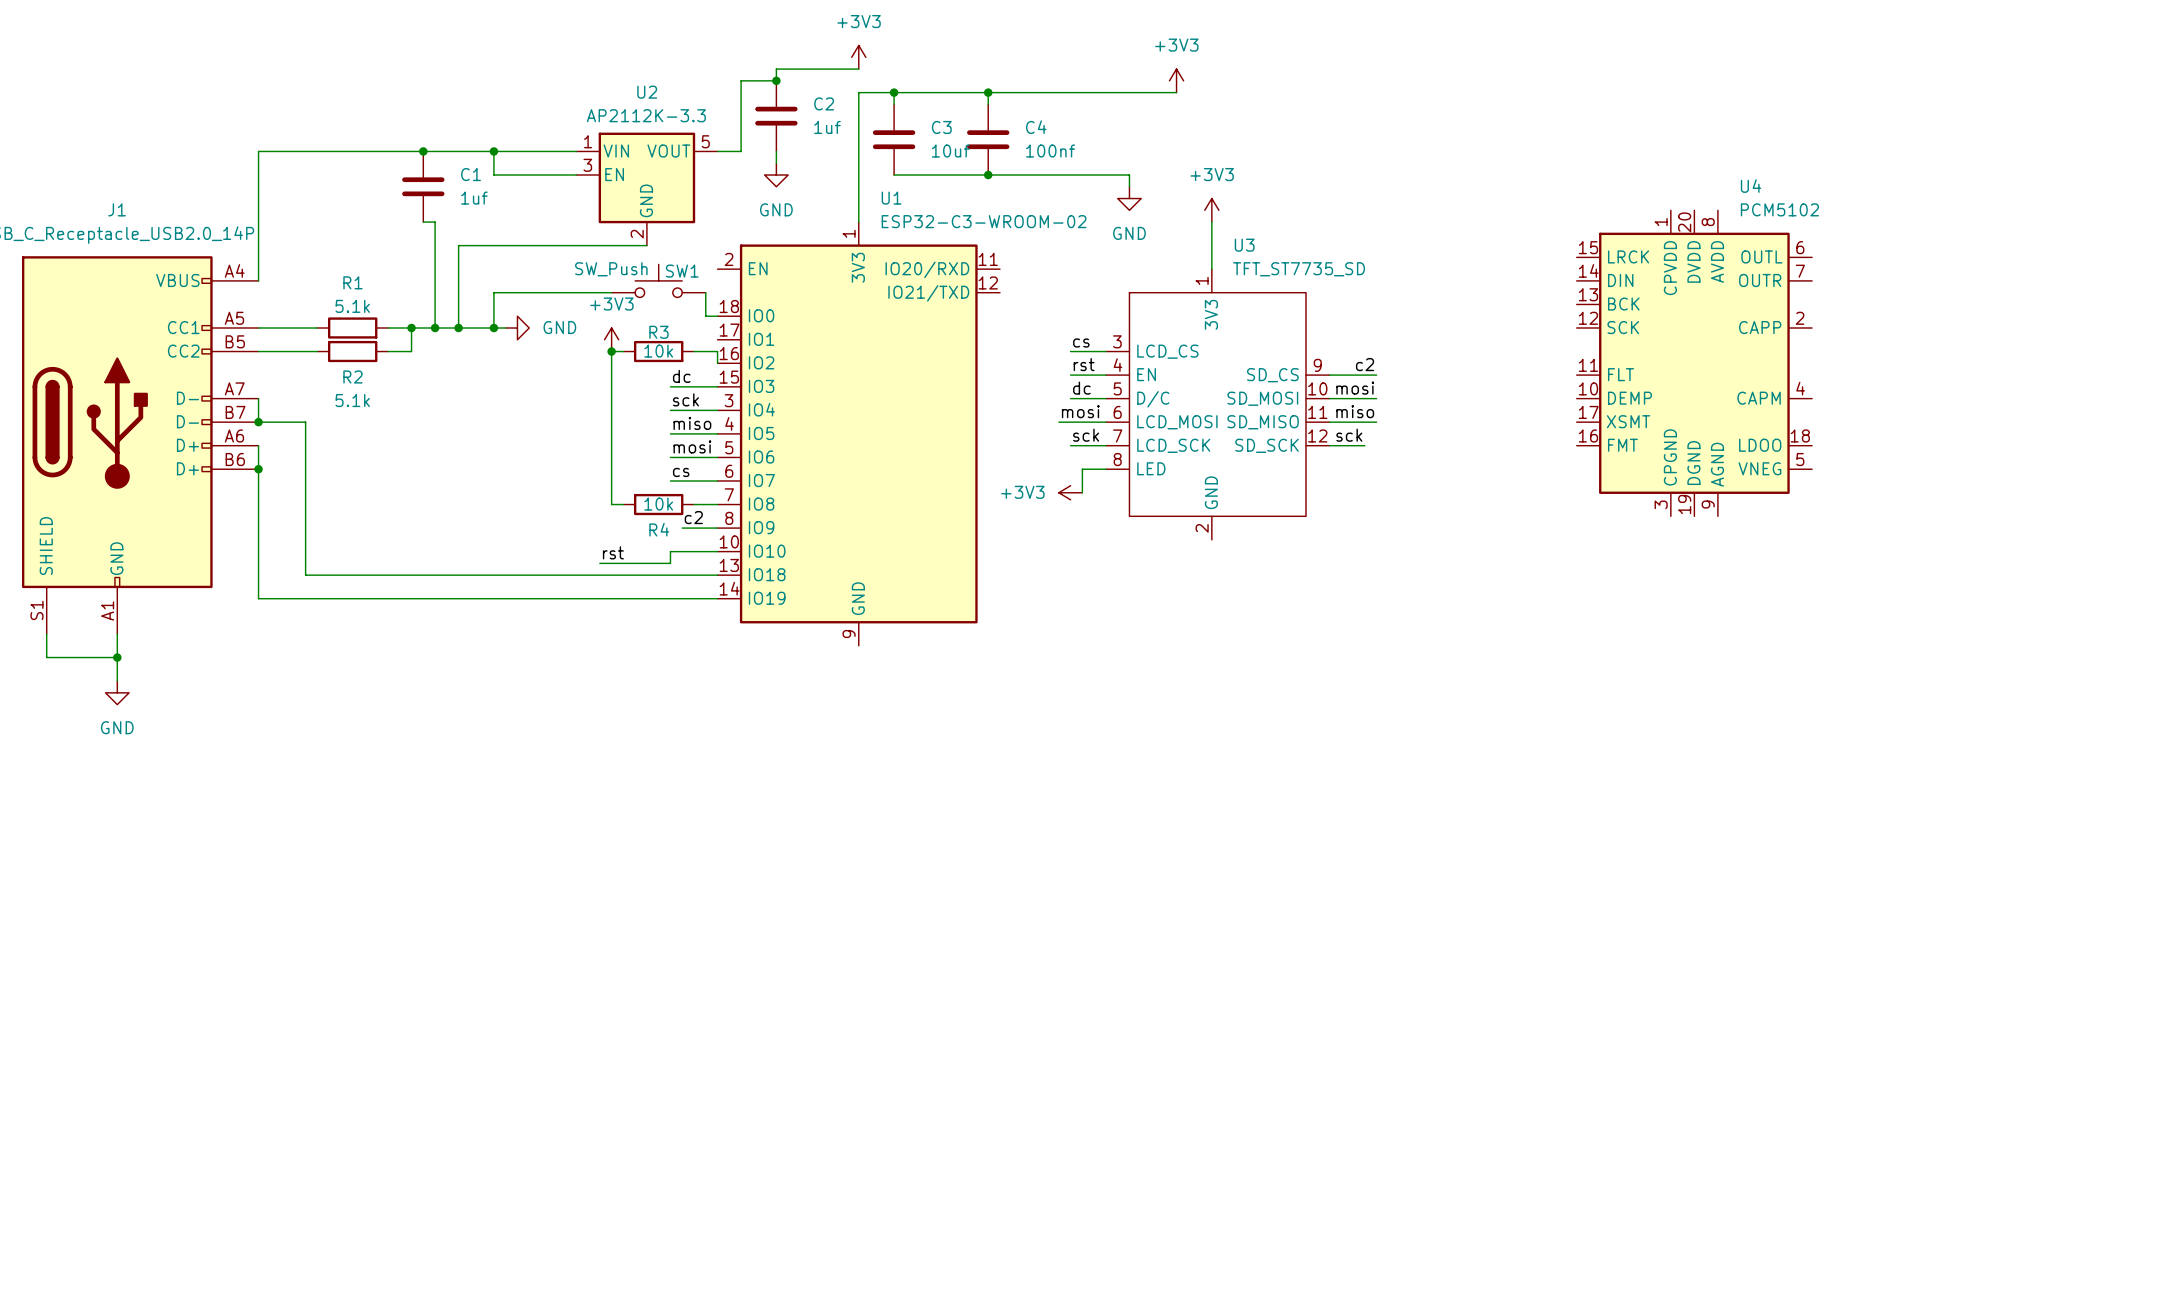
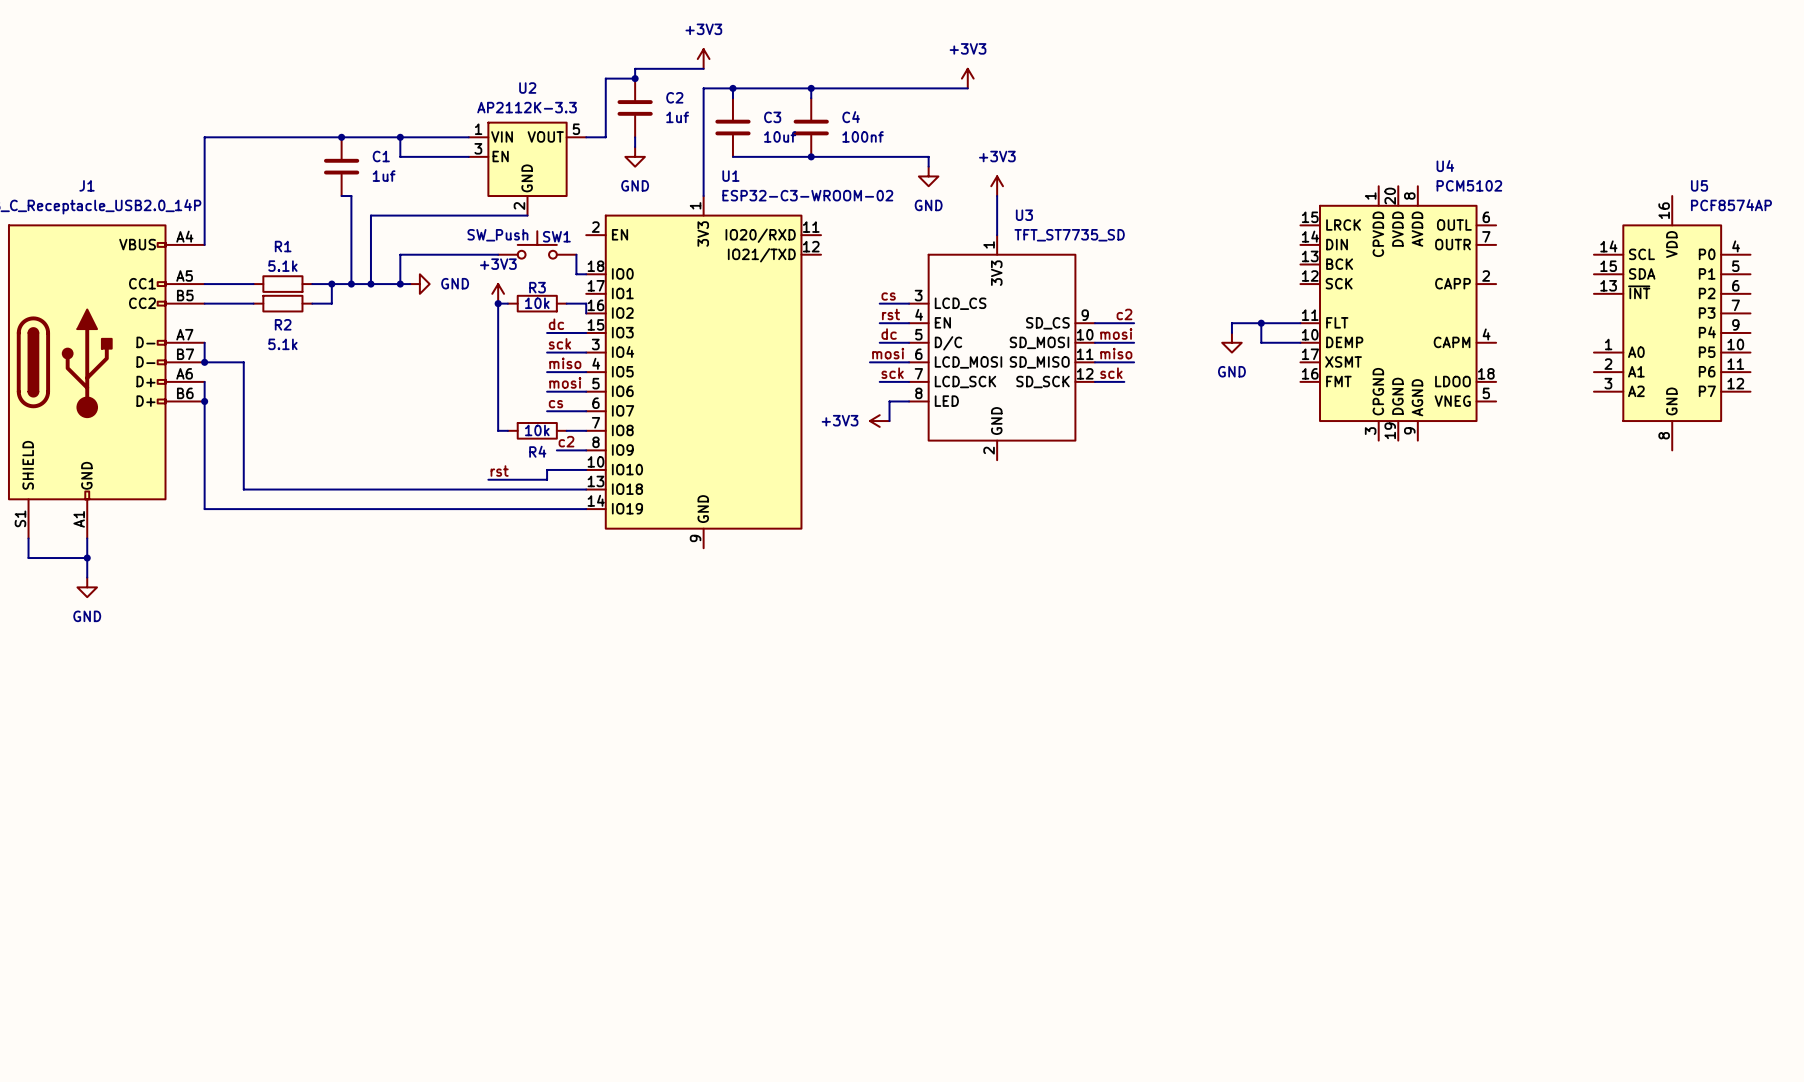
wire: none -> (1261, 323) (1261, 342) (1300, 342)
junction: none -> (1261, 323)
wire: none -> (1300, 323) (1231, 323) (1231, 332)
U5: none -> PCF8574AP (1672, 323)
power symbol: none -> GND (1231, 342)

